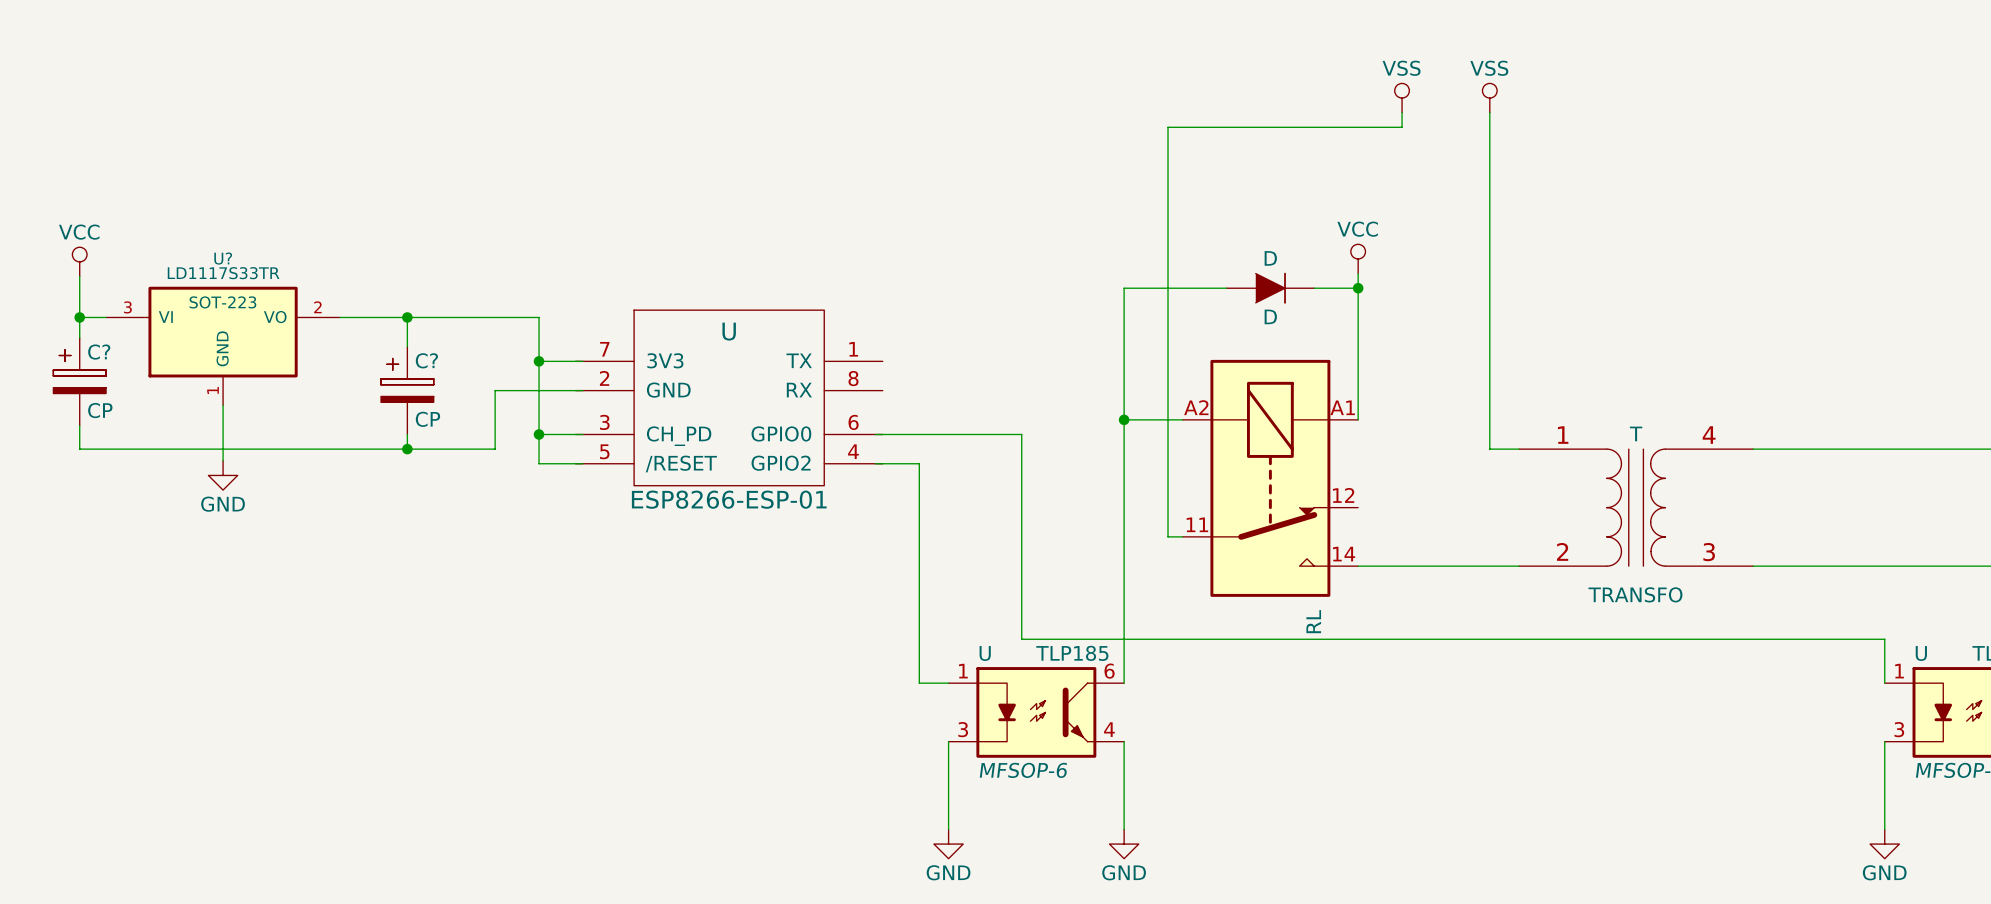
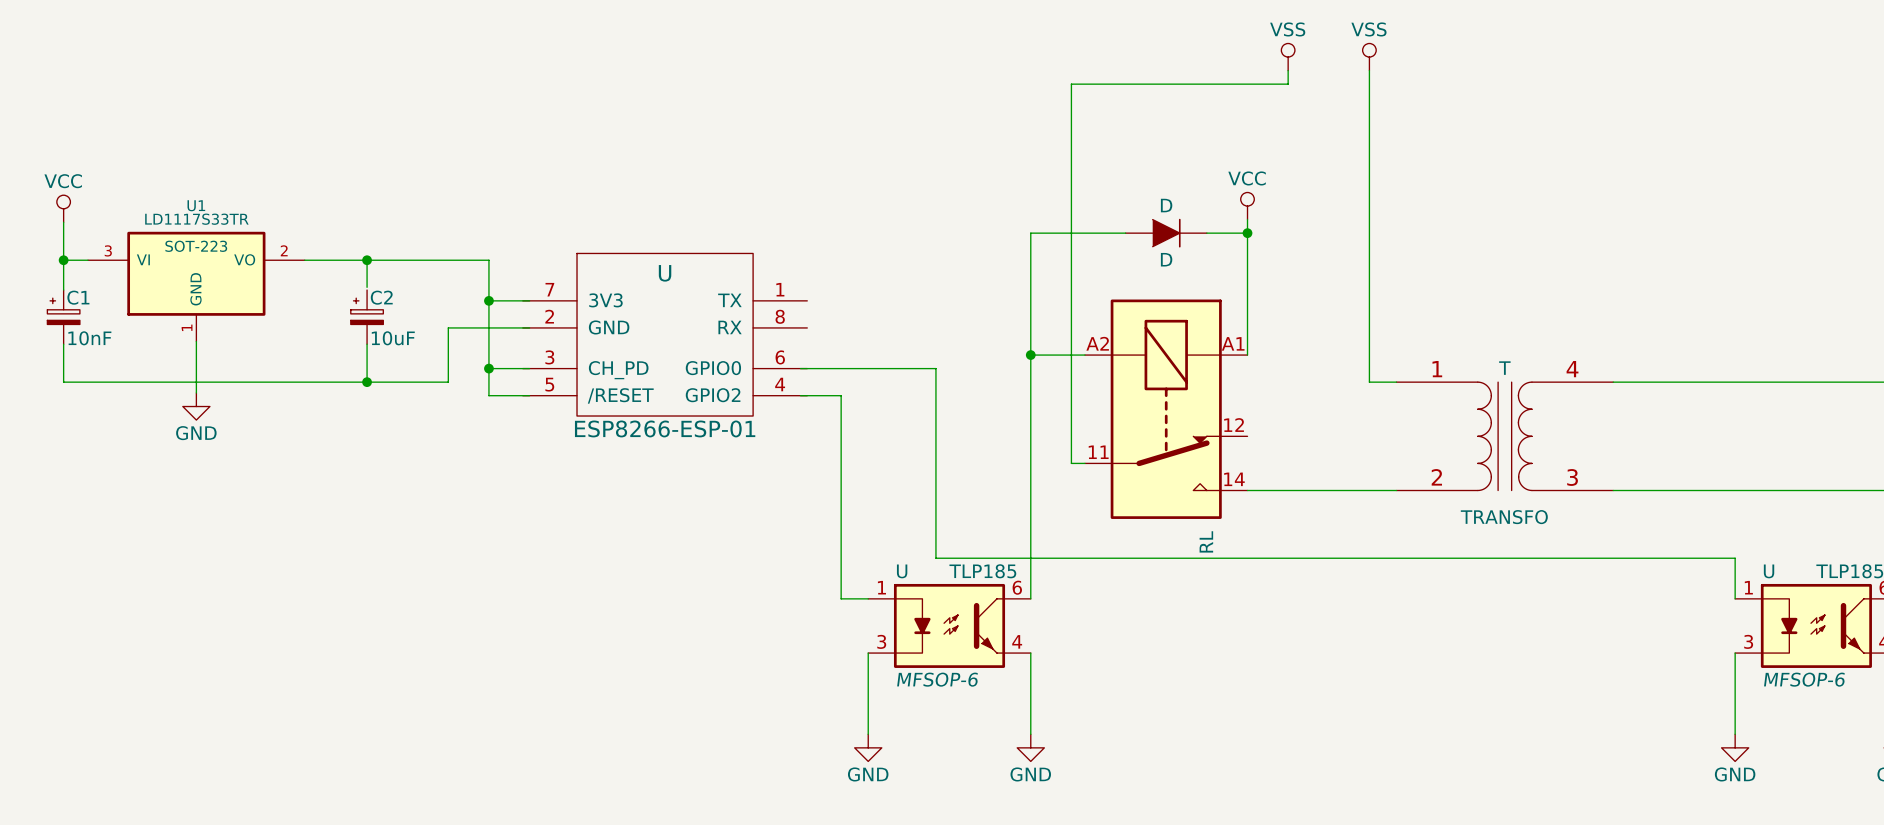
U? name: U? (223, 258) -> U1 (196, 205)
C1: none -> 10nF (63, 317)
C2: none -> 10uF (367, 317)
C?: CP (79, 381) -> none
C?: CP (407, 390) -> none

